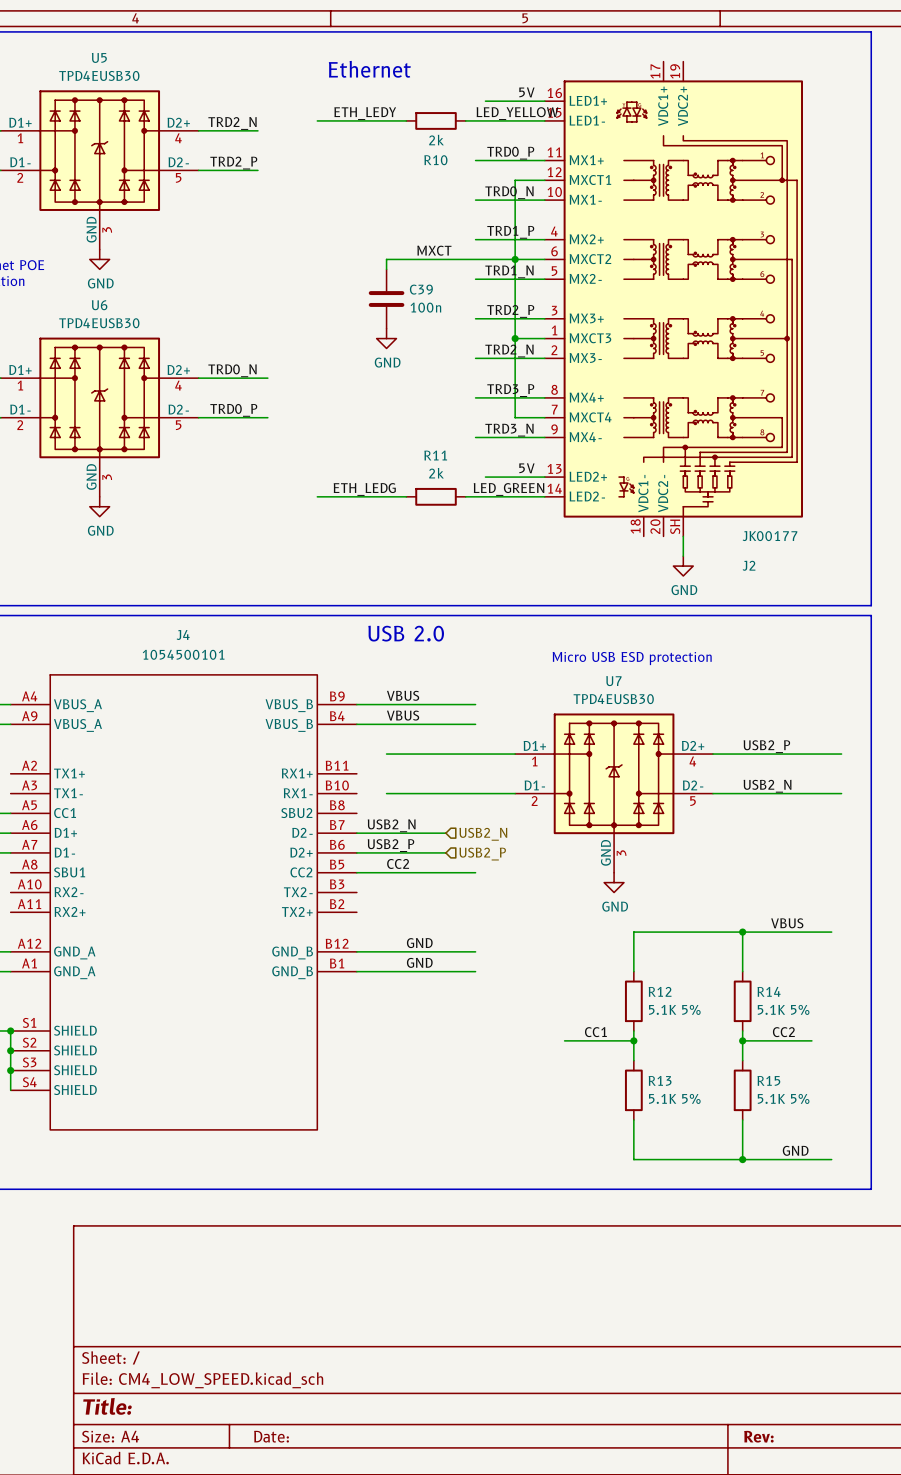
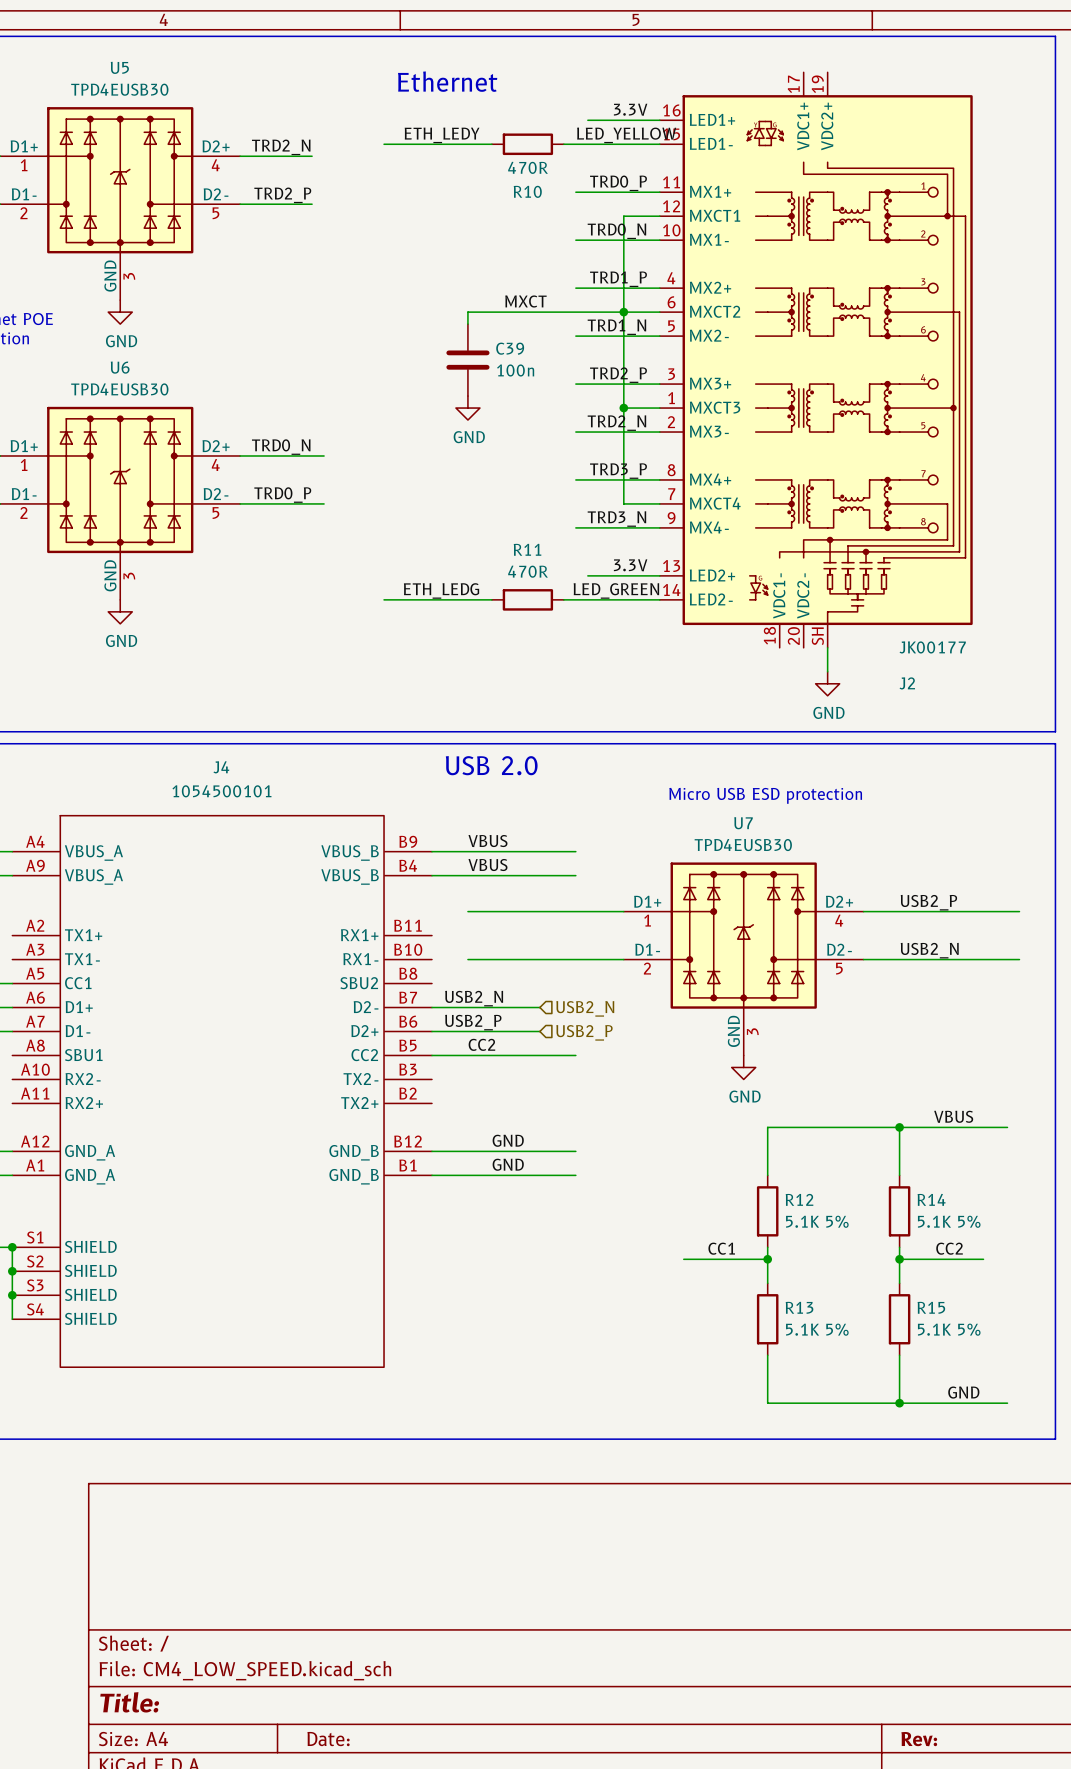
label: 5V (526, 92) -> 3.3V (630, 109)
R10 value: 2k (436, 140) -> 470R (528, 167)
label: 5V (526, 468) -> 3.3V (630, 565)
R11 value: 2k (436, 473) -> 470R (528, 571)

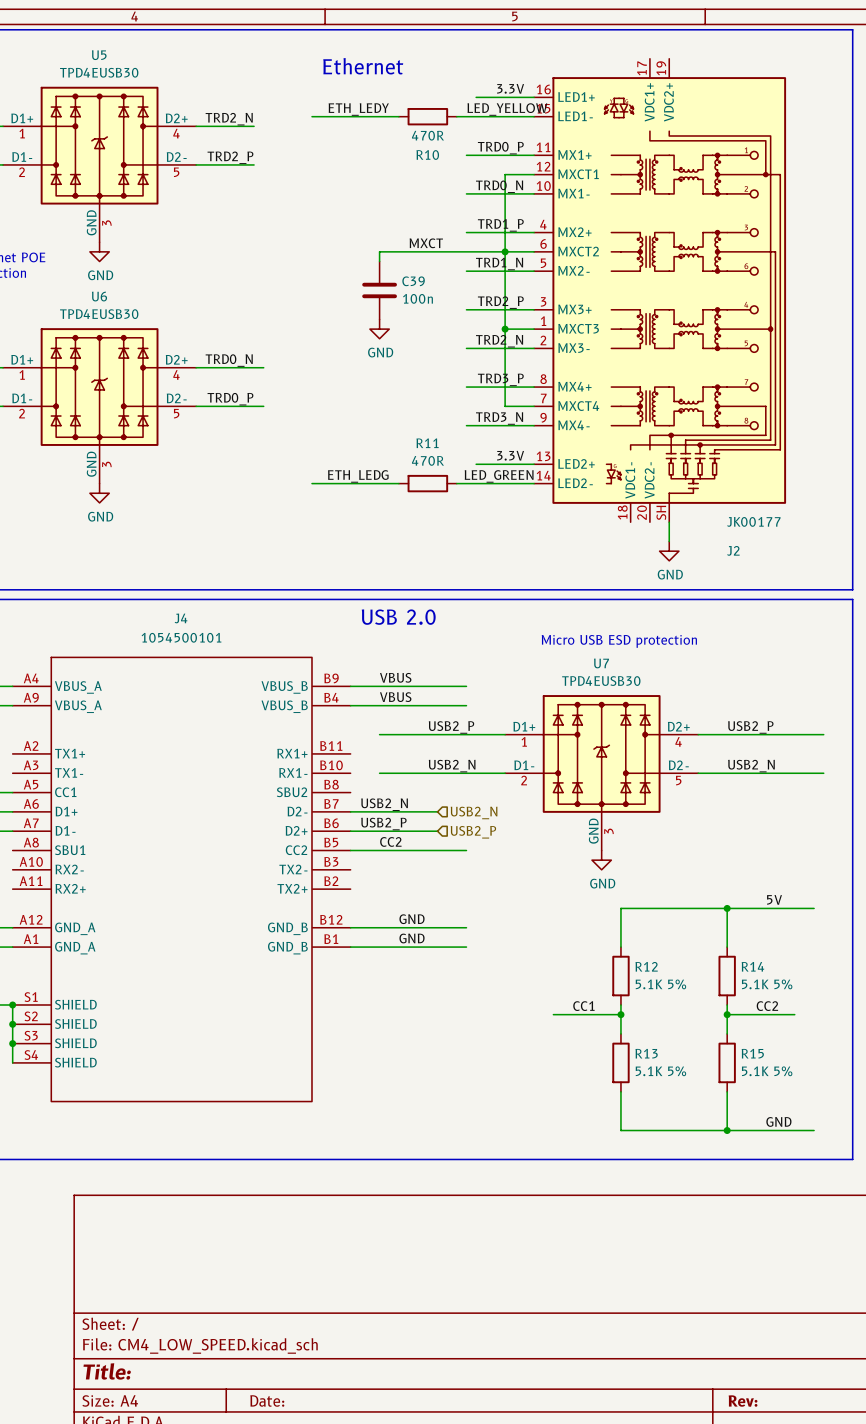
label: none -> USB2_P (451, 727)
label: none -> USB2_N (452, 766)
label: VBUS (953, 1116) -> none
label: none -> 5V (774, 899)

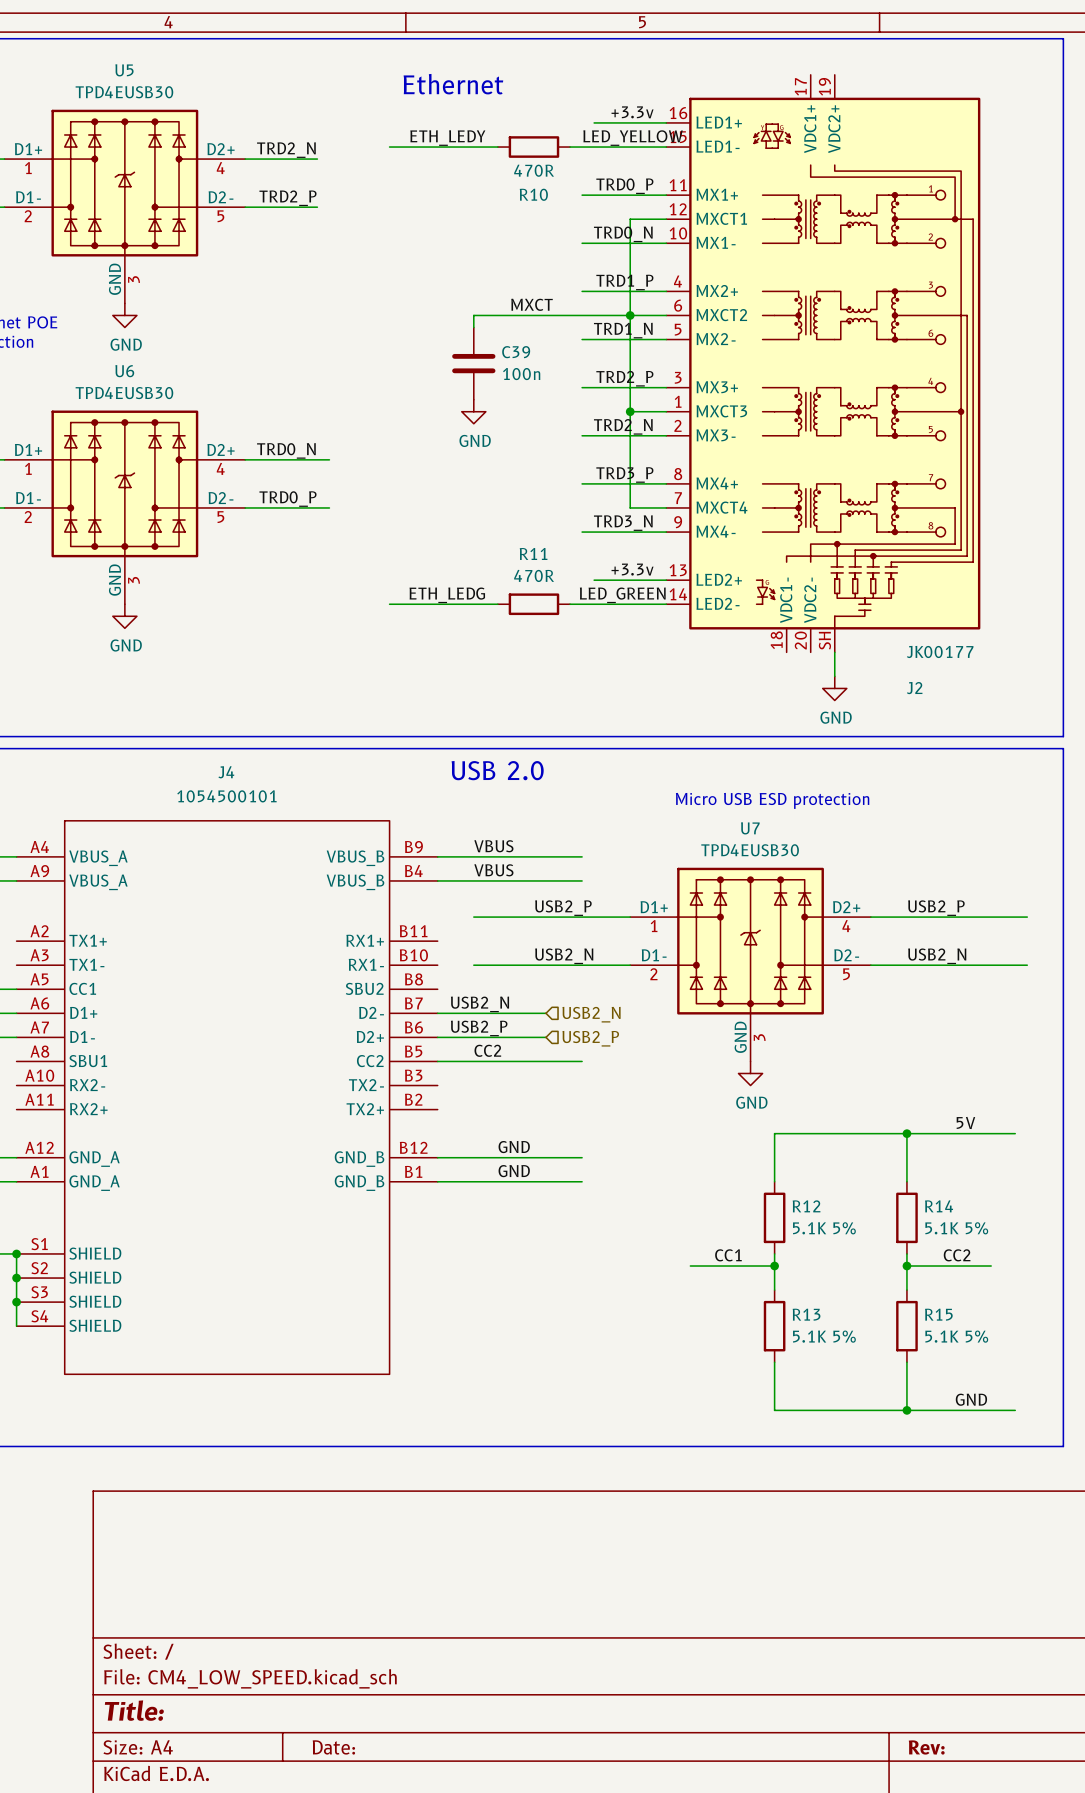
label: 3.3V (510, 88) -> +3.3v (632, 112)
label: 3.3V (510, 455) -> +3.3v (632, 569)

